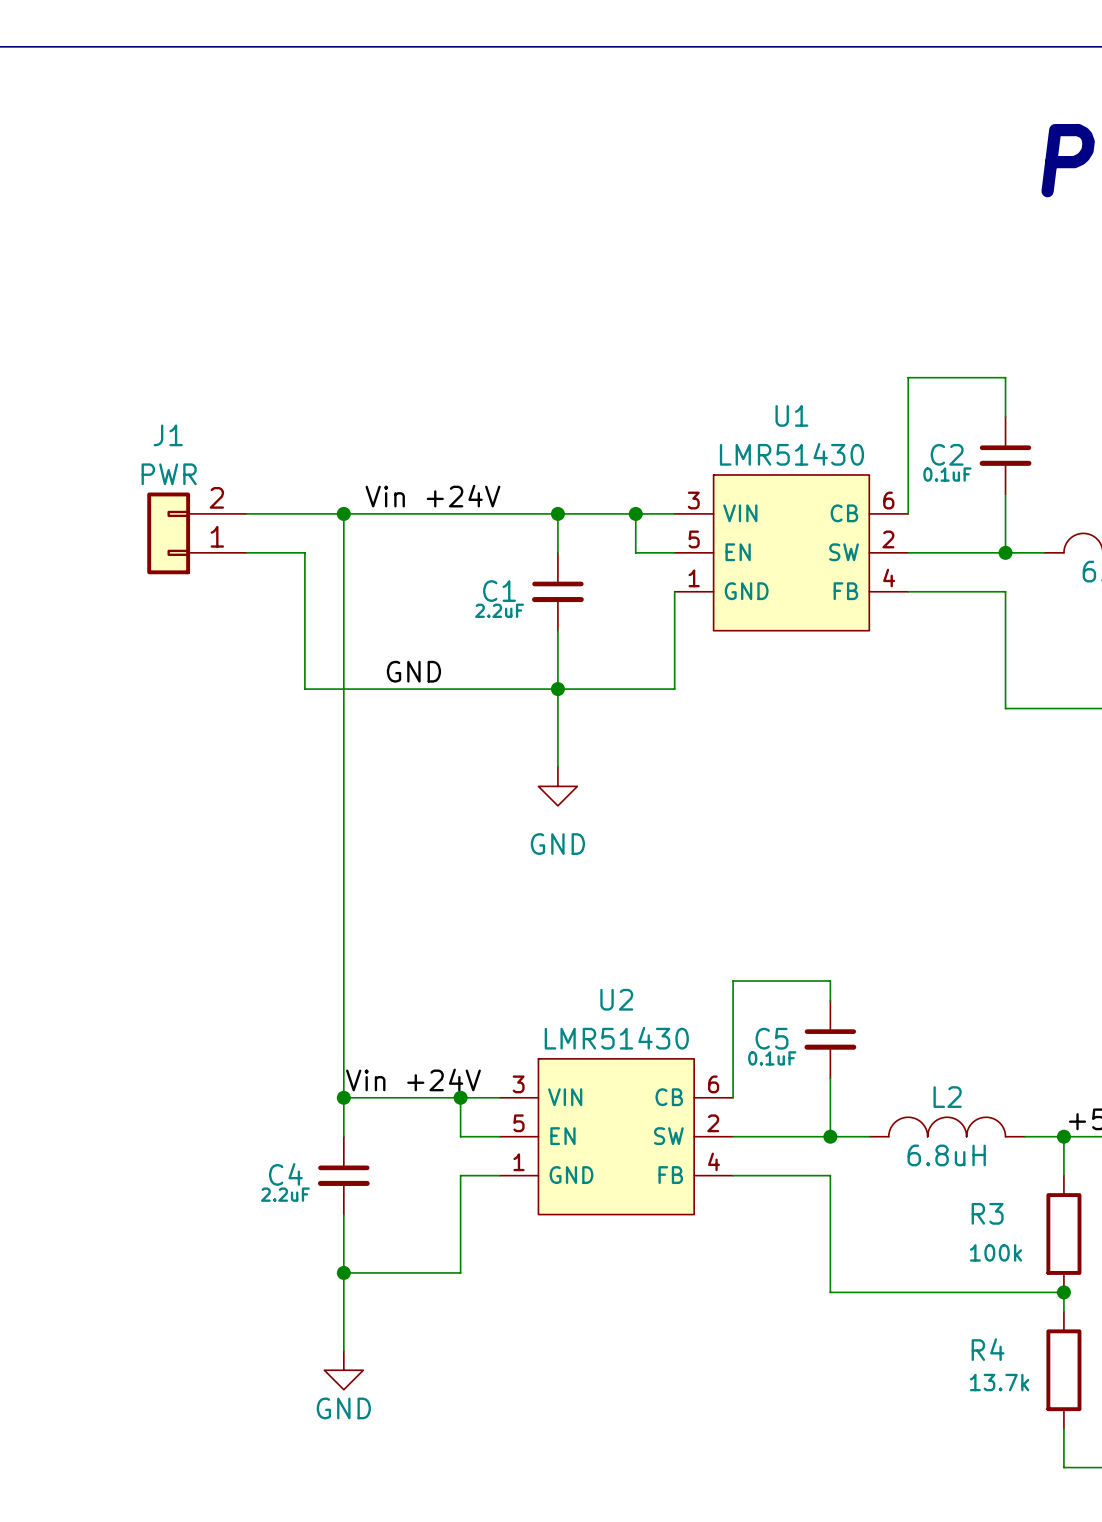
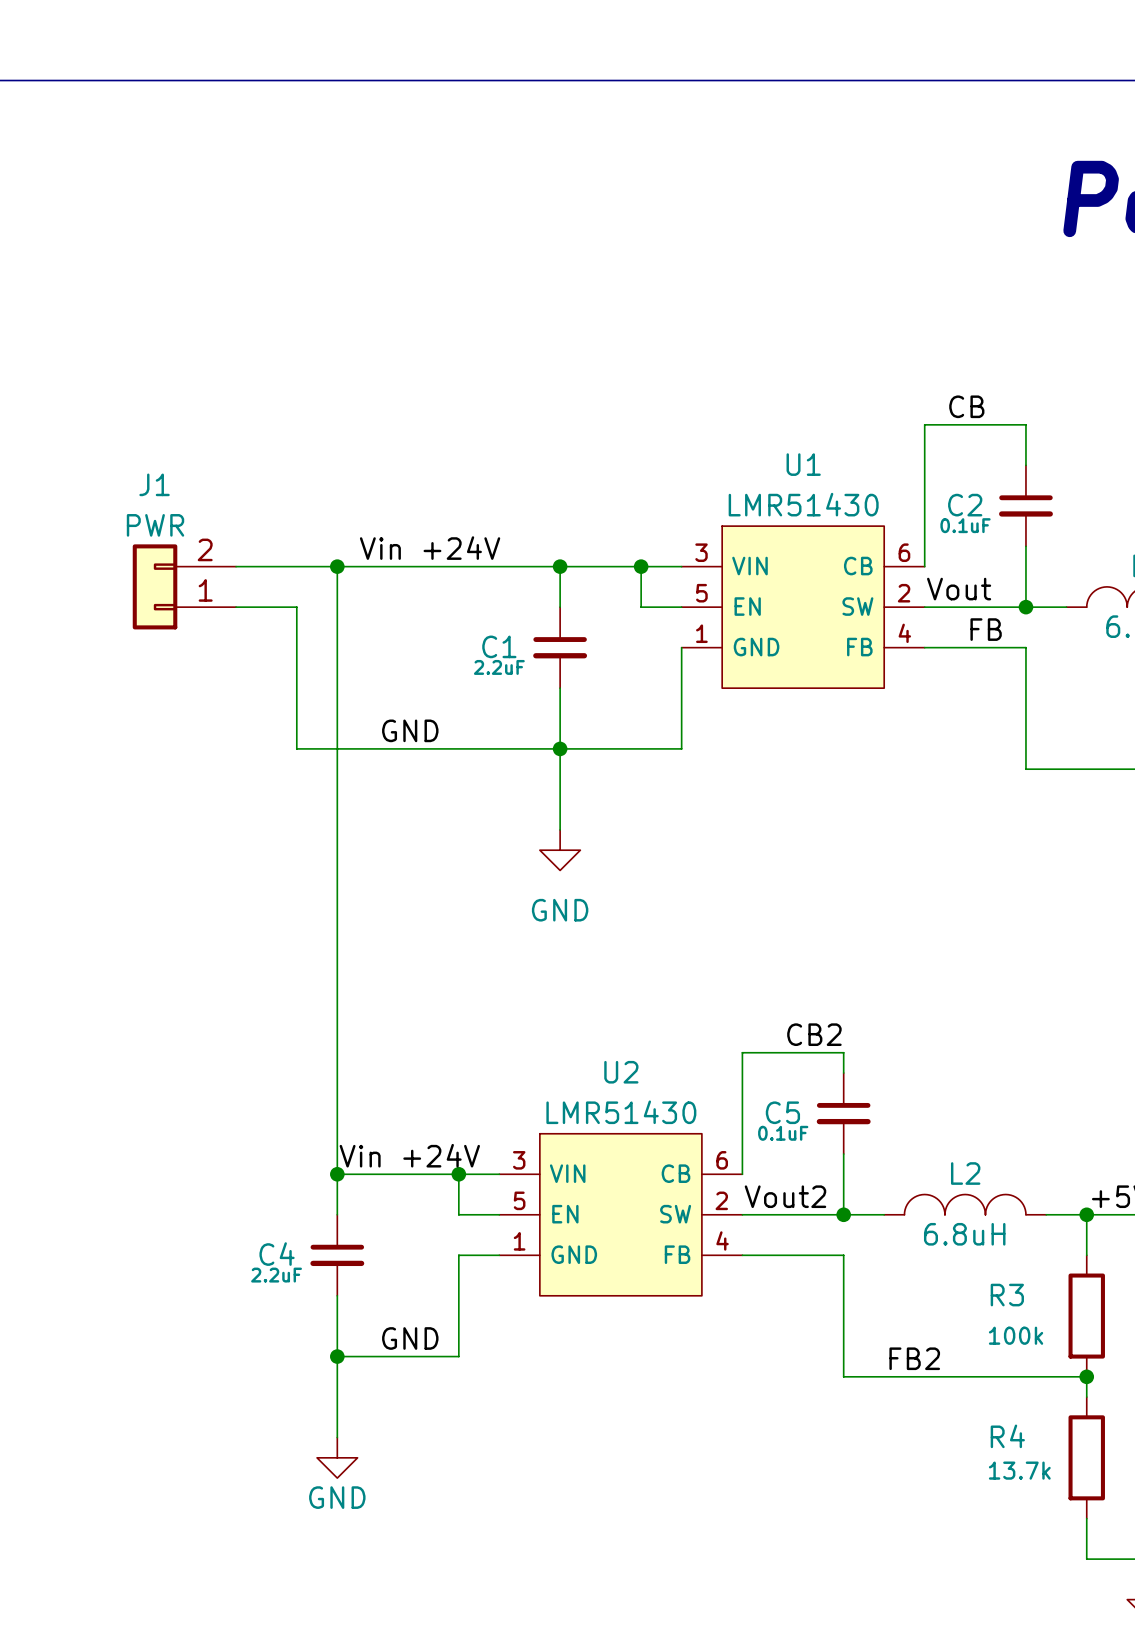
label: none -> CB (966, 406)
label: none -> Vout (959, 589)
label: none -> FB (986, 629)
label: none -> CB2 (814, 1034)
label: none -> Vout2 (785, 1196)
label: none -> GND (410, 1338)
label: none -> FB2 (914, 1358)

